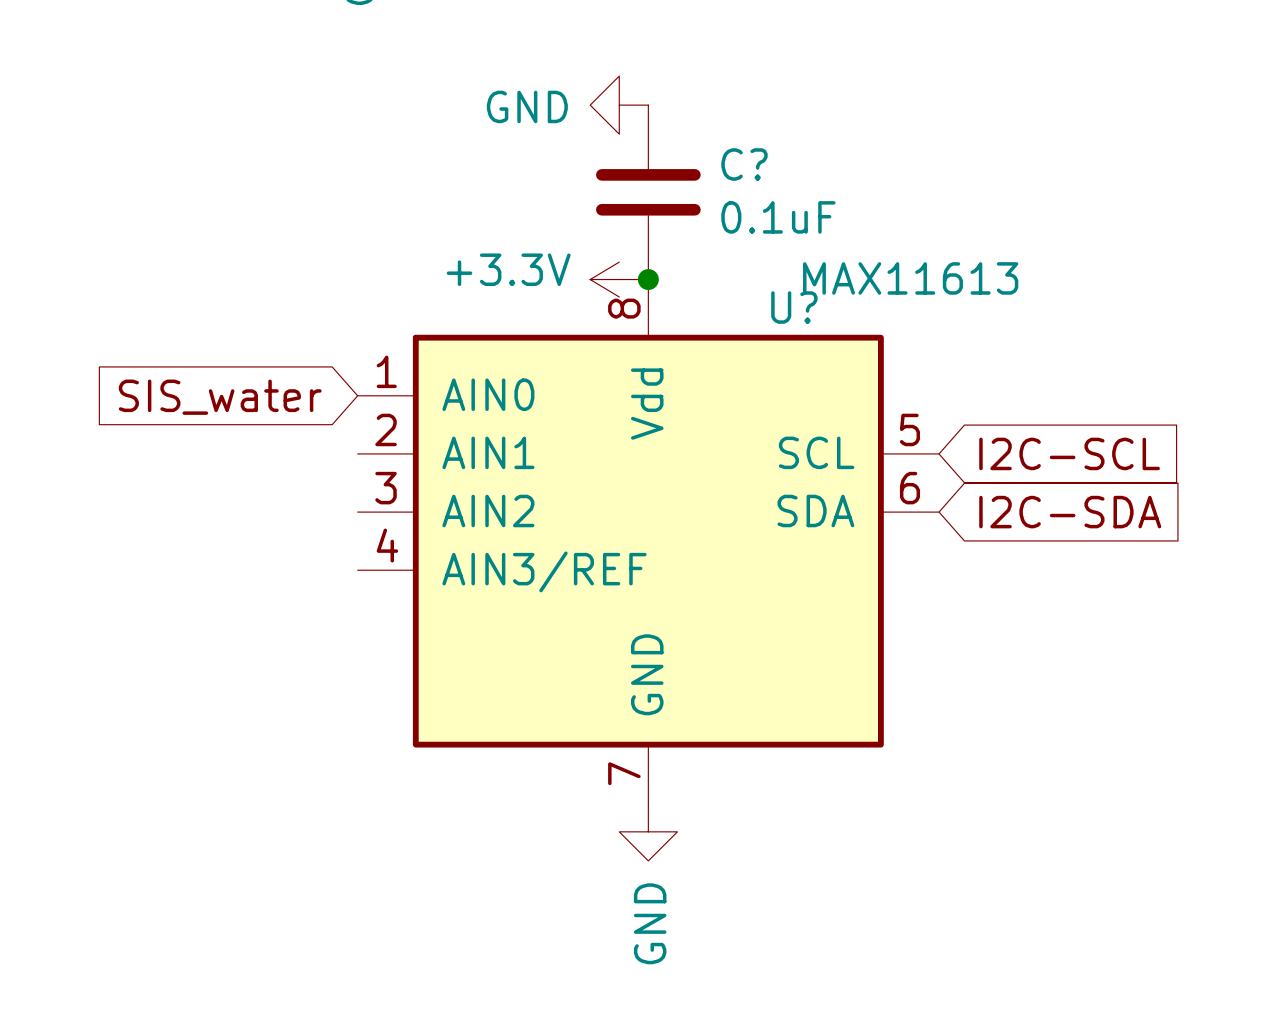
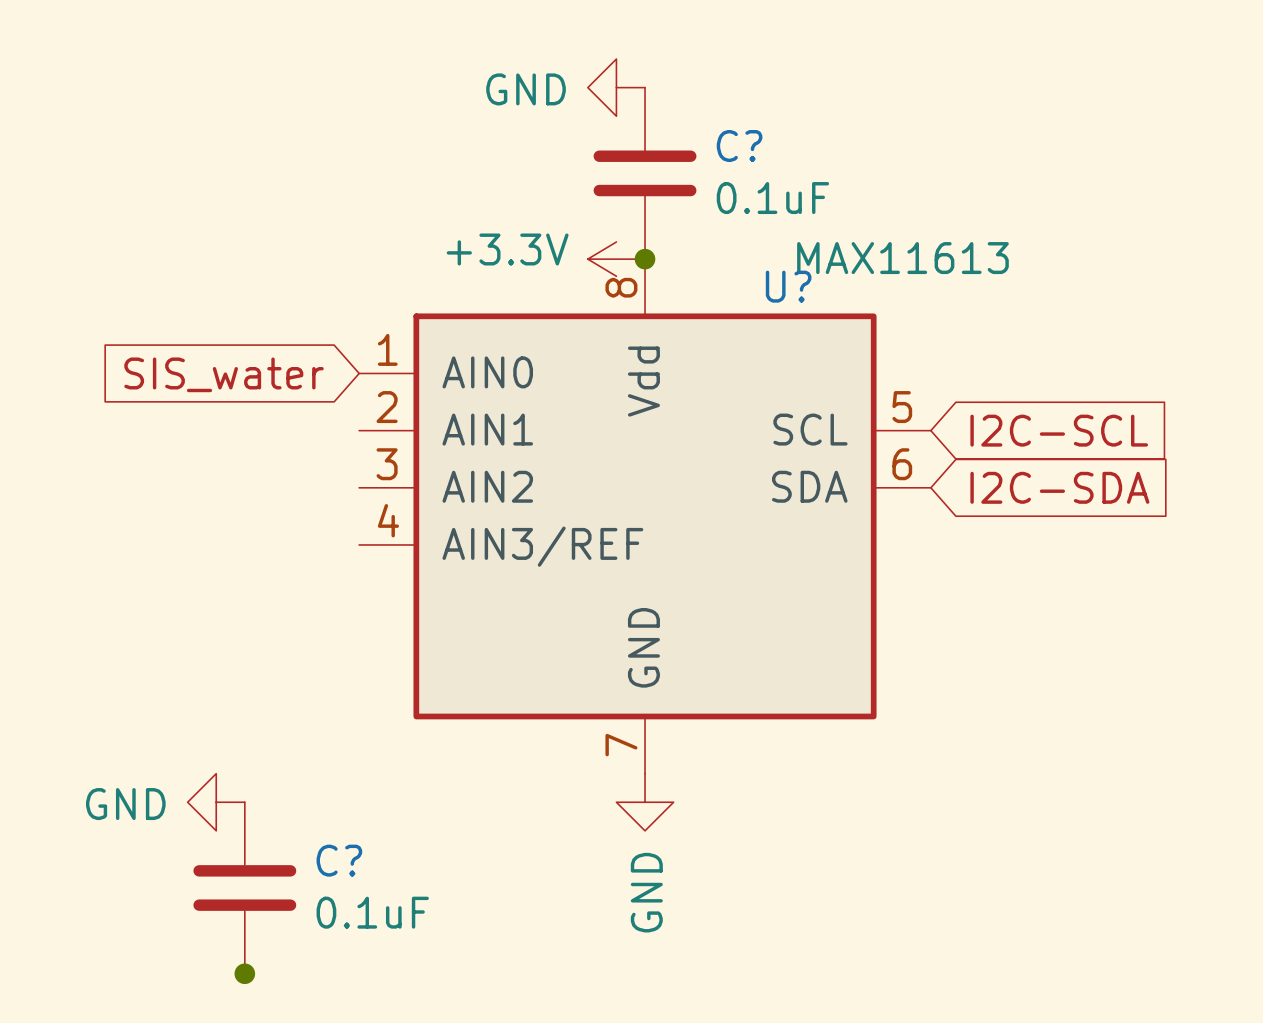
power symbol: none -> GND (216, 802)
C?: none -> 0.1uF (244, 888)
junction: none -> (244, 973)

